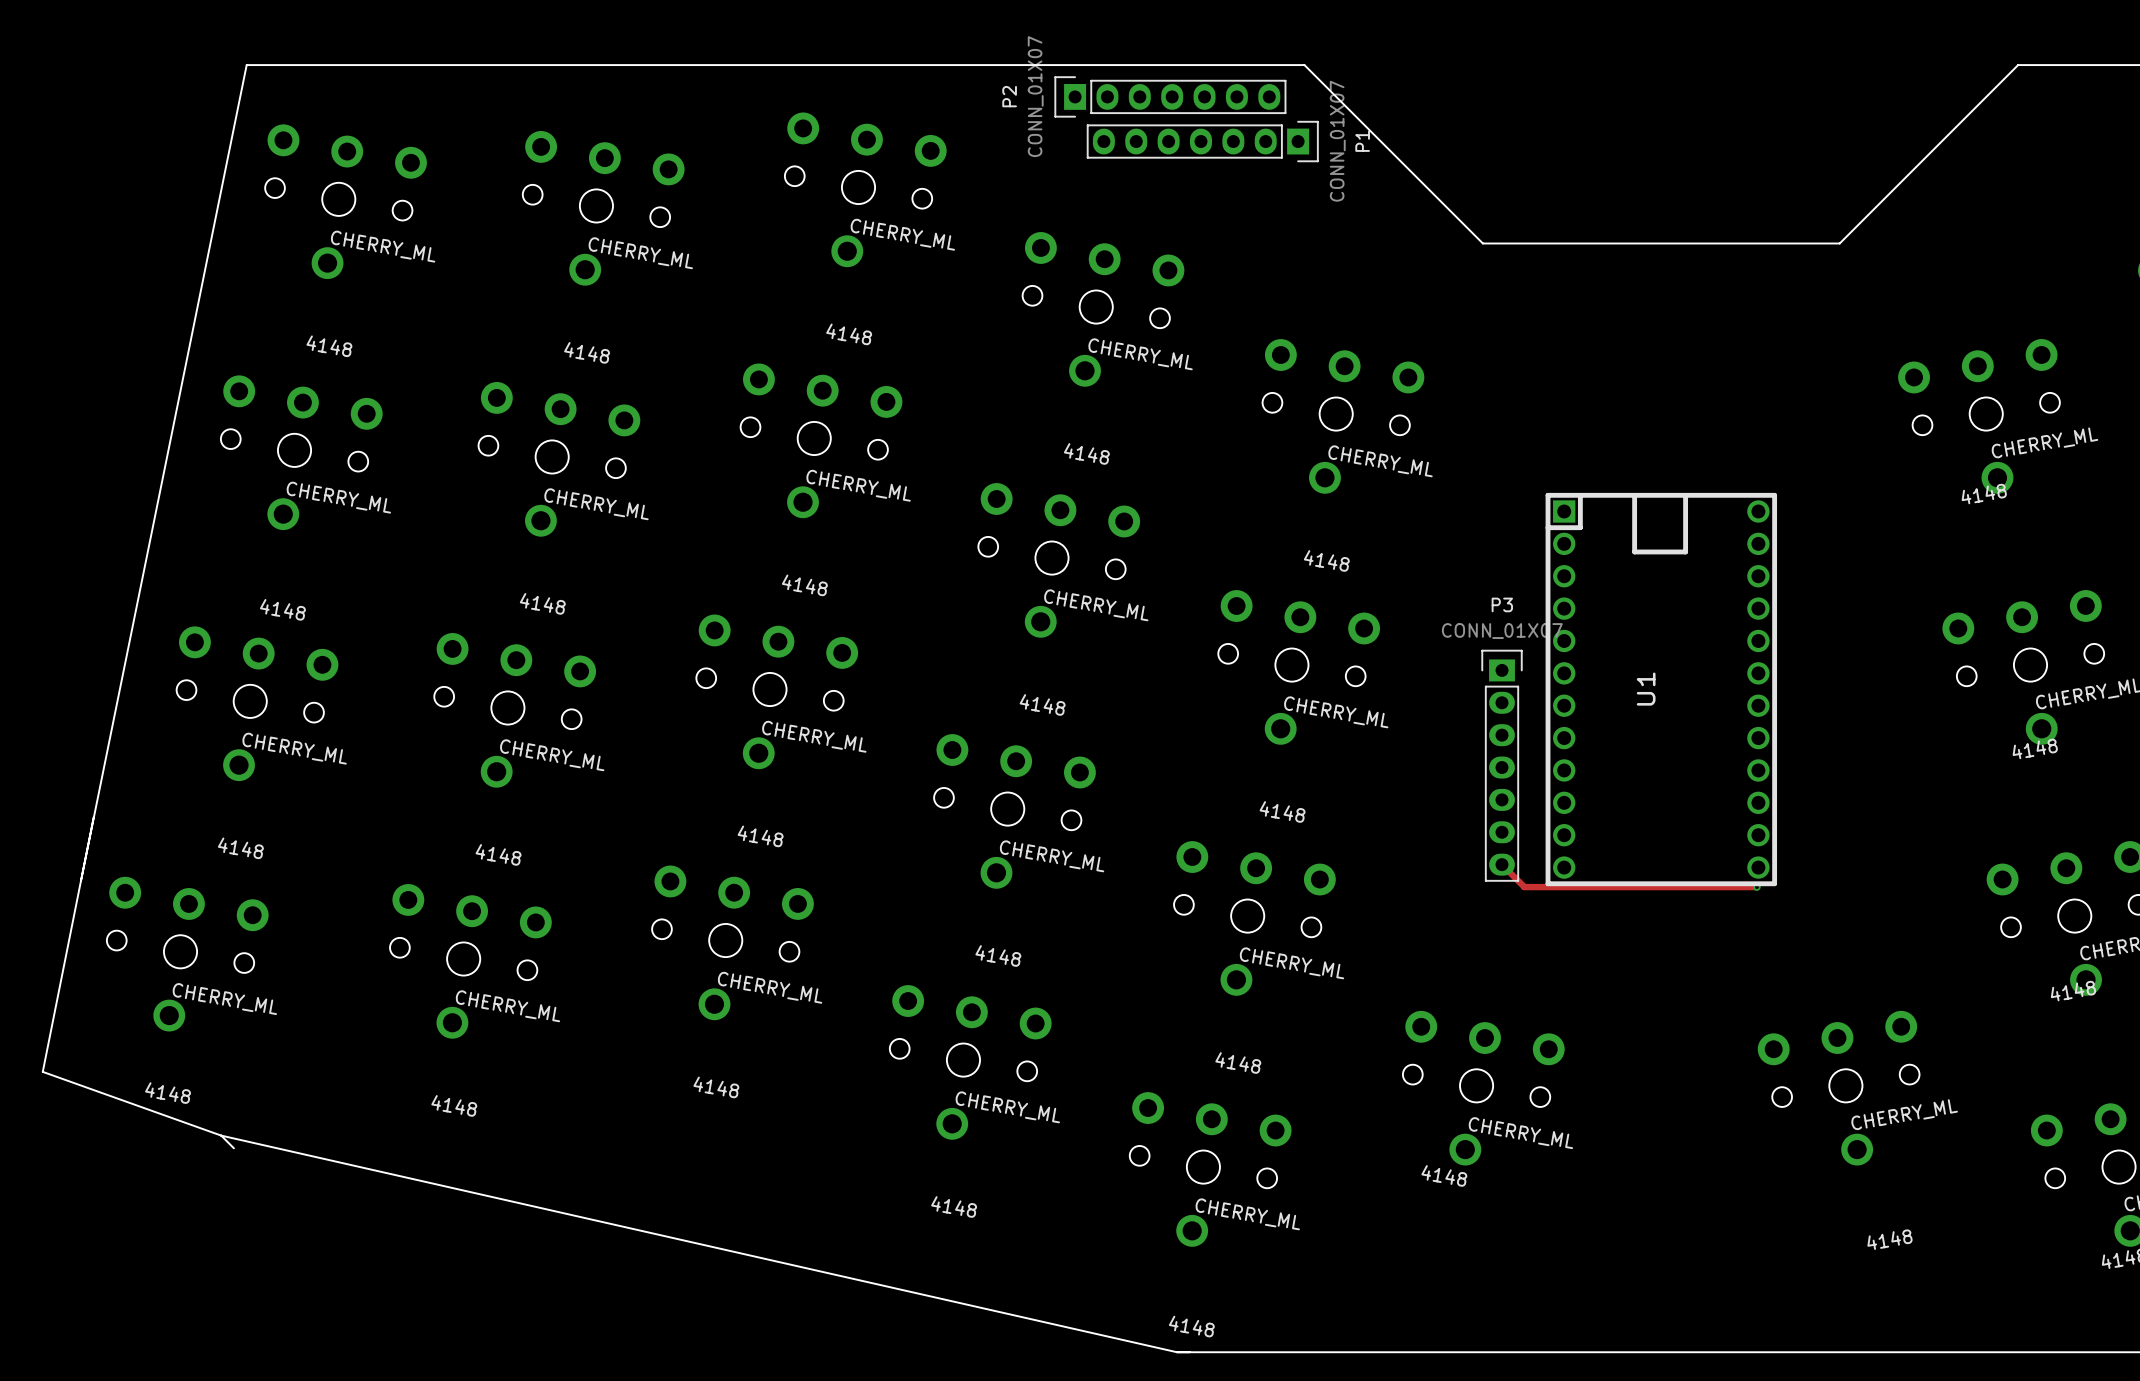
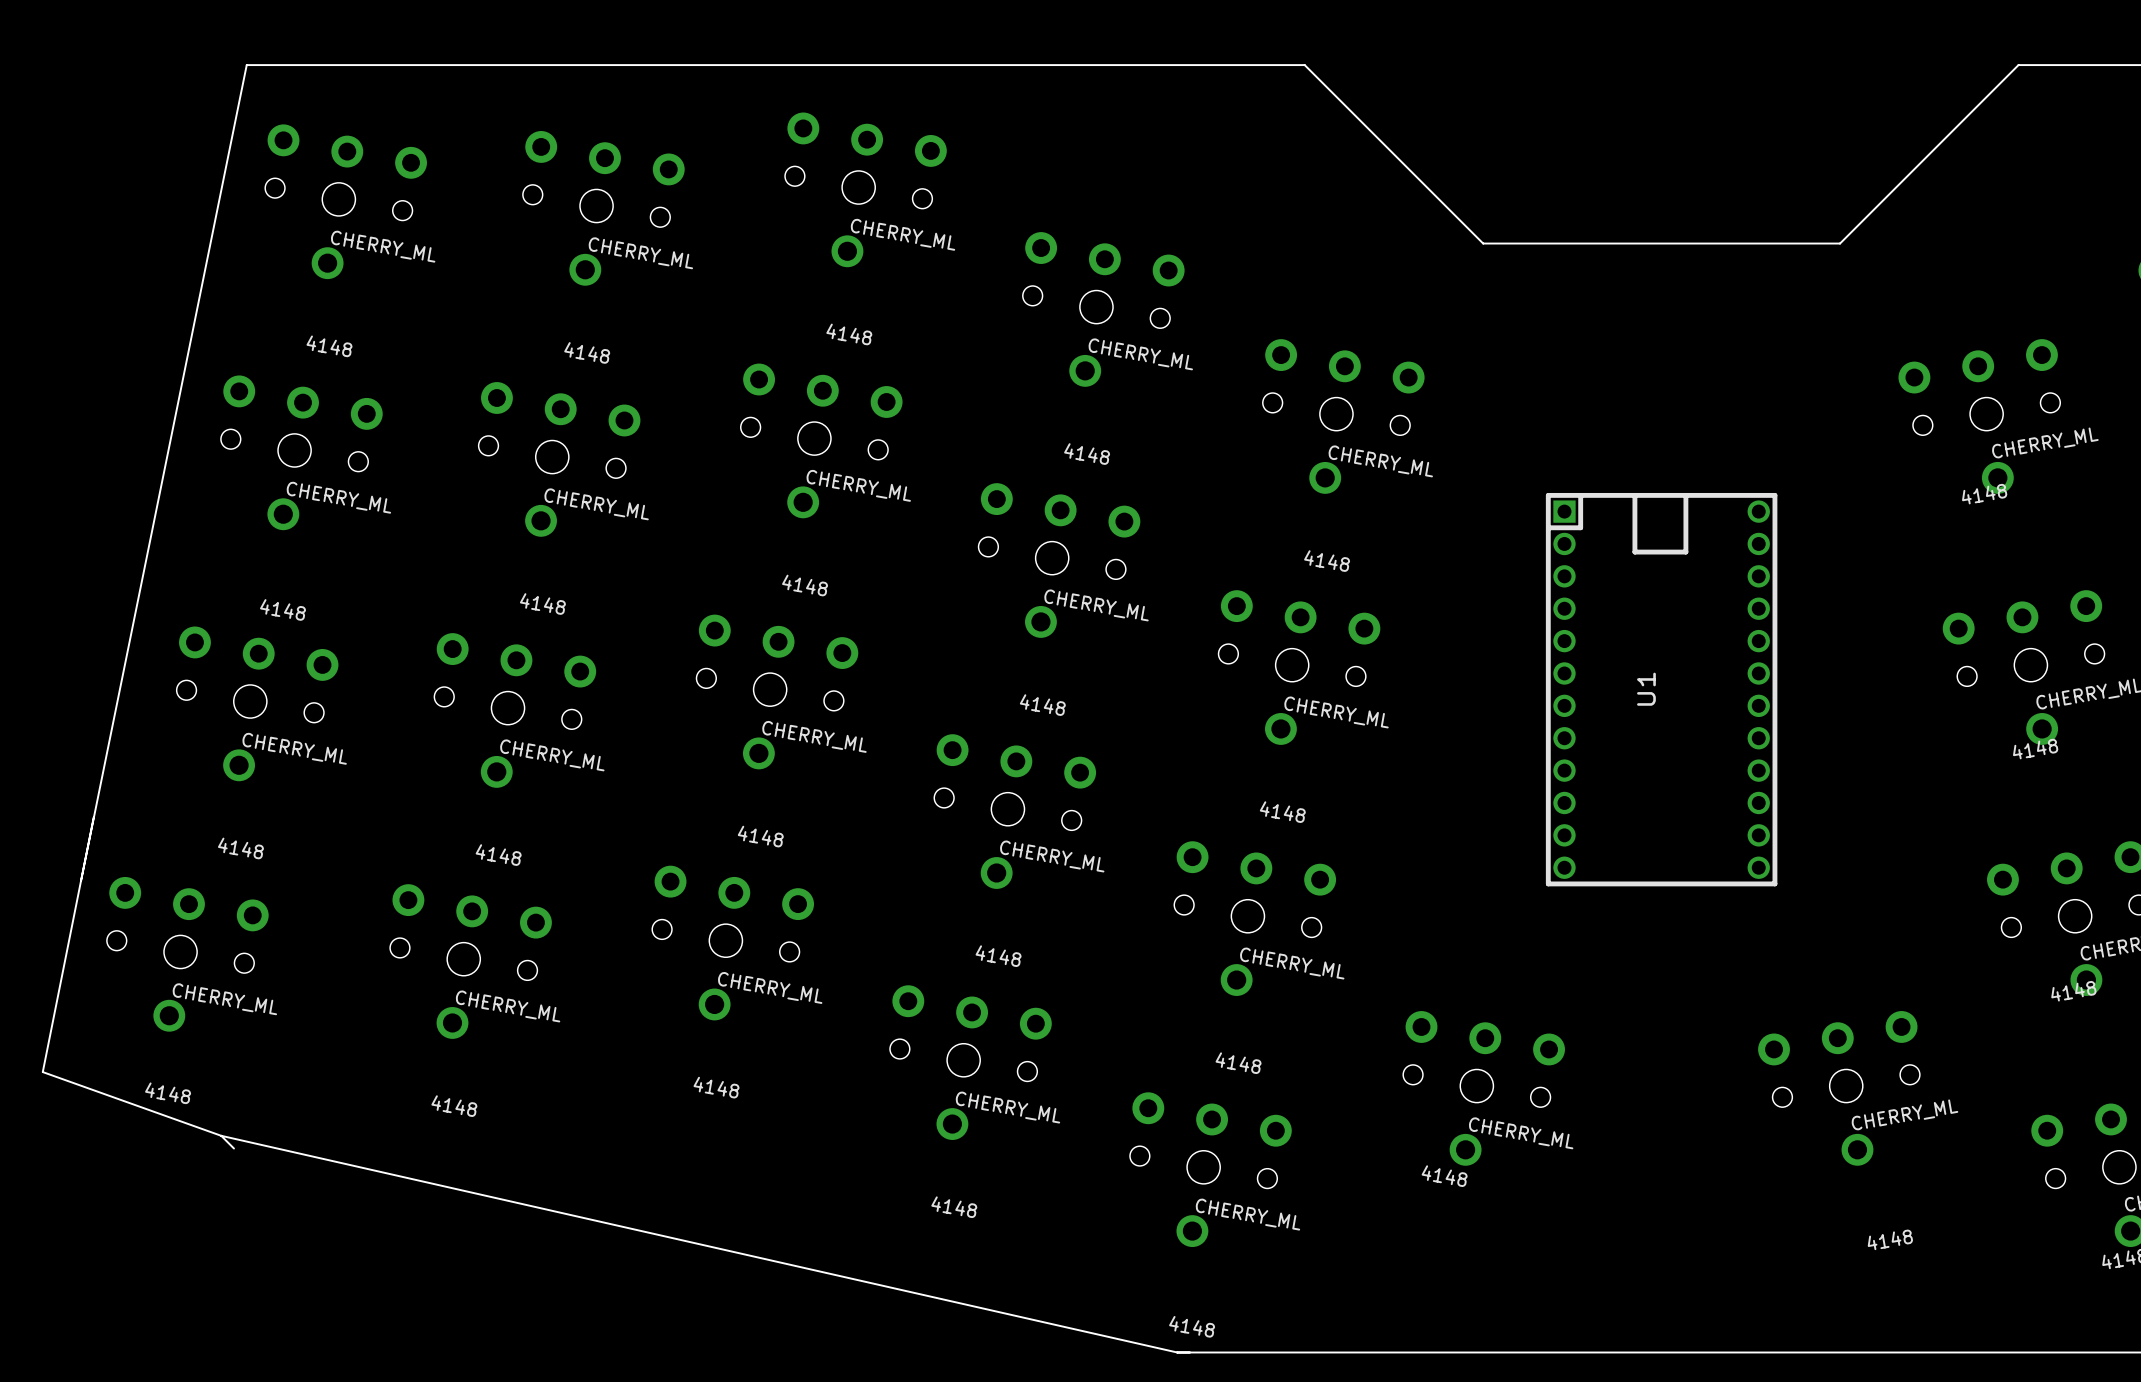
P2: CONN_01X07 (1170, 96) -> none
P1: CONN_01X07 (1202, 141) -> none
P3: CONN_01X07 (1502, 765) -> none
track: (1502, 864) (1524, 887) (1756, 887) -> none
via: (1756, 887) -> none

